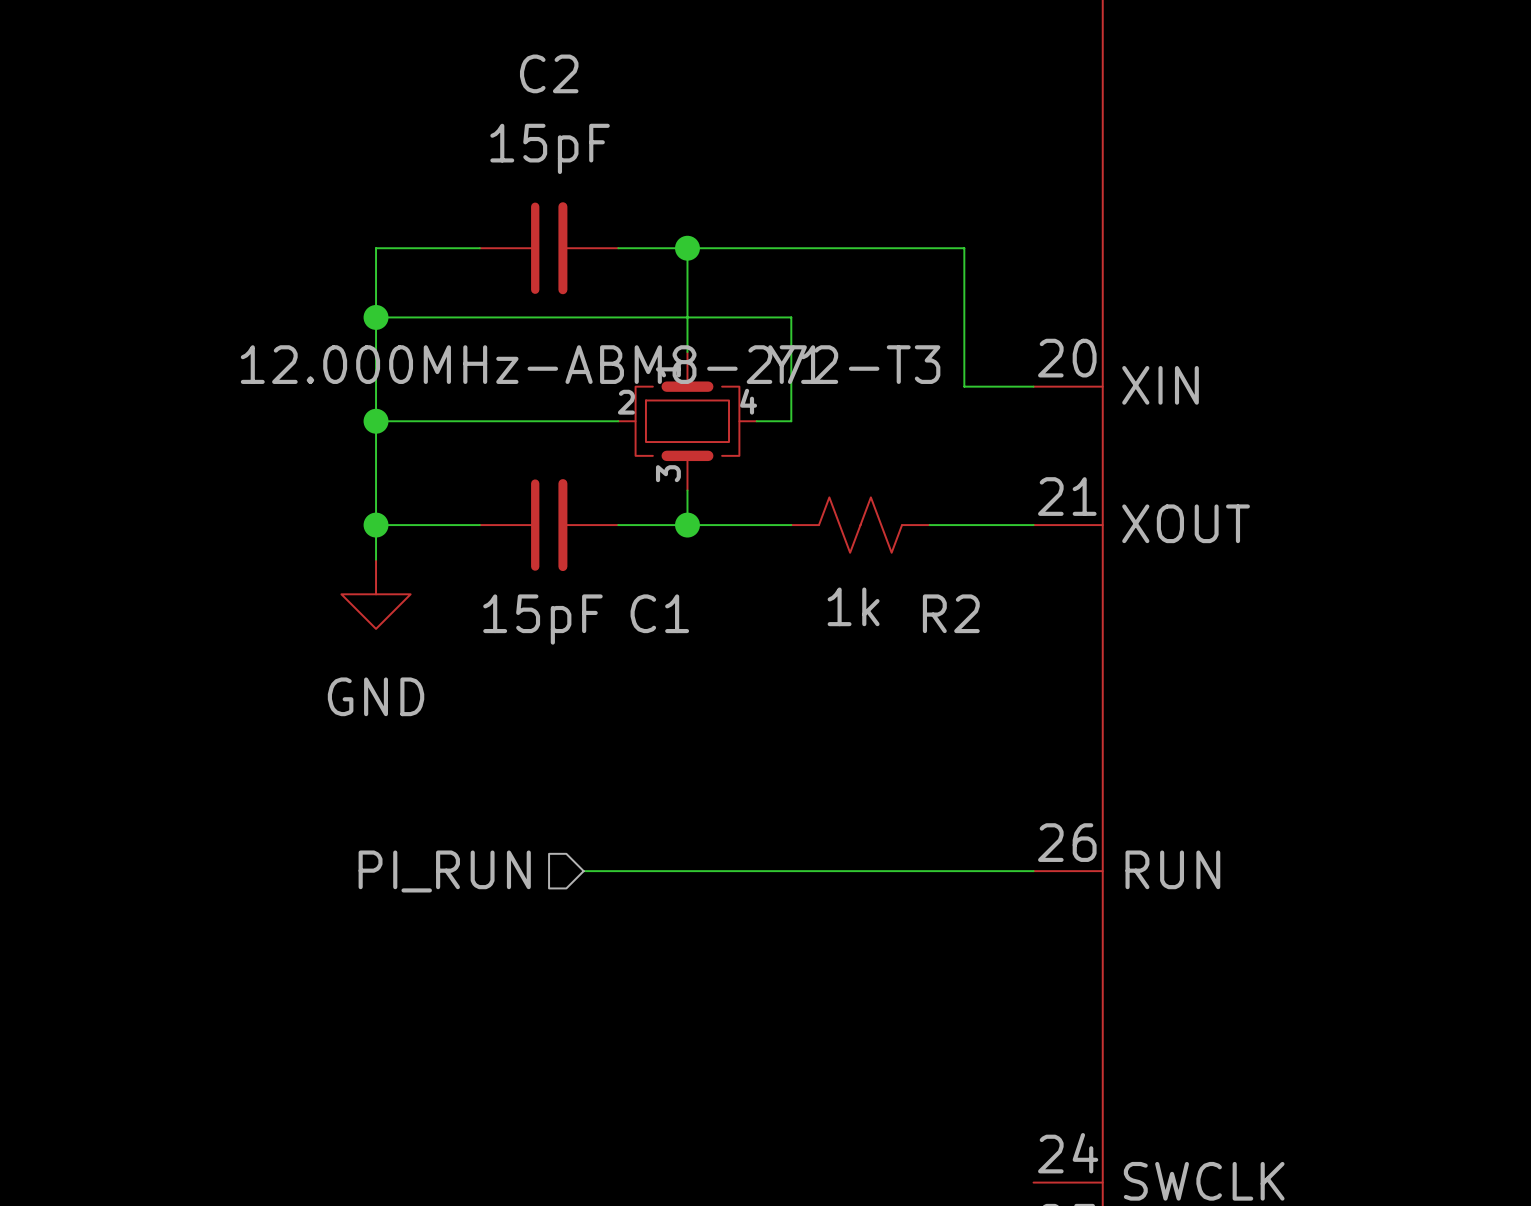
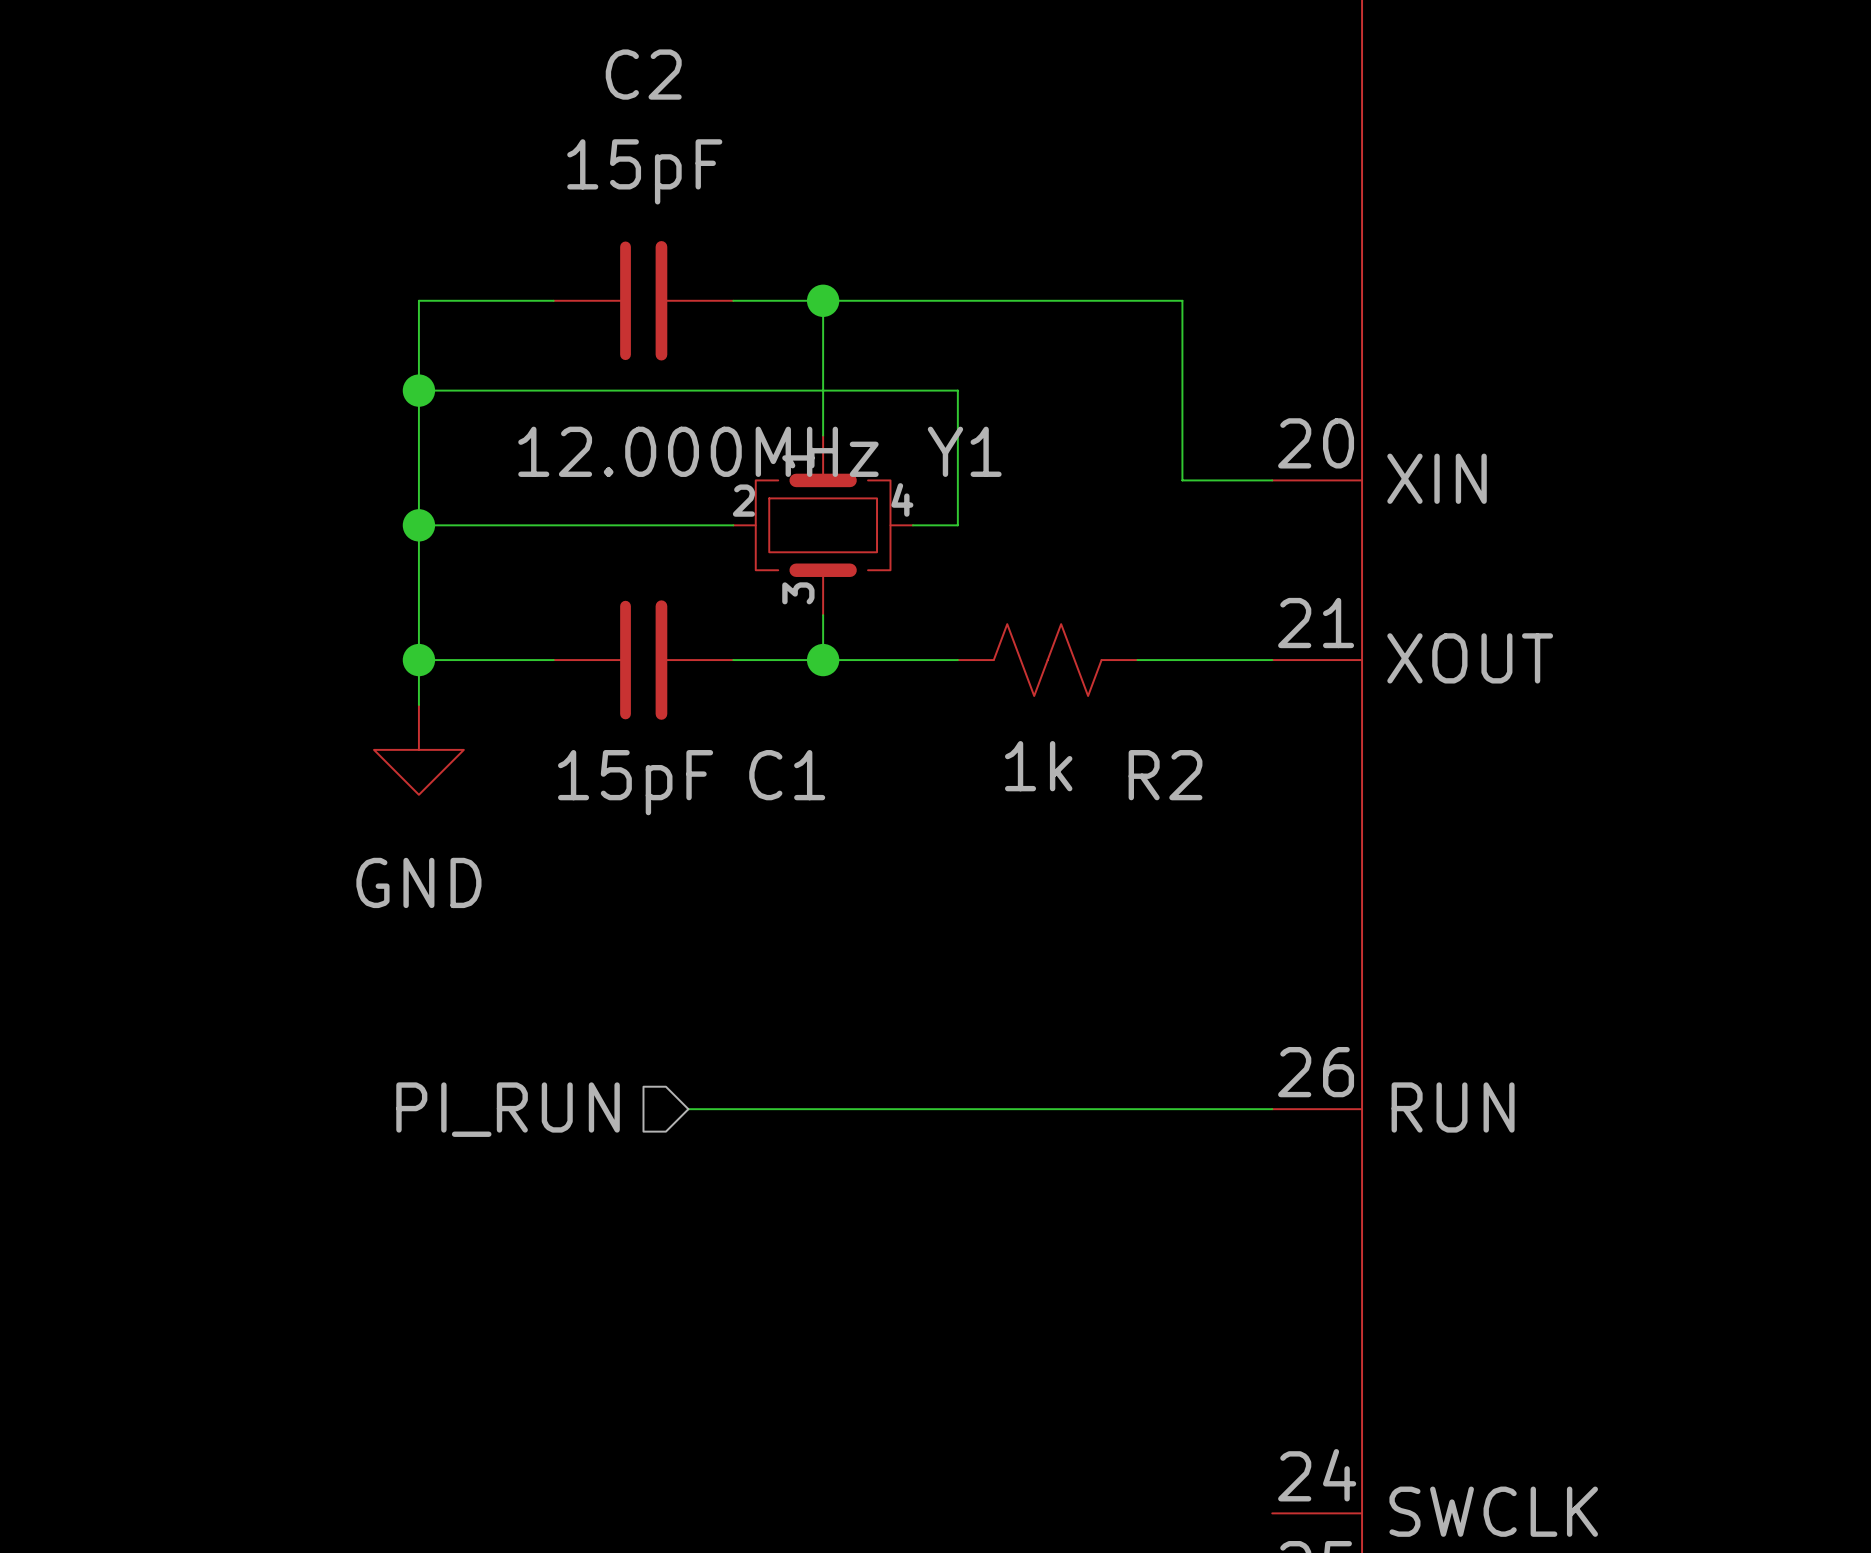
Y1 value: 12.000MHz-ABM8-272-T3 (590, 364) -> 12.000MHz (698, 451)

